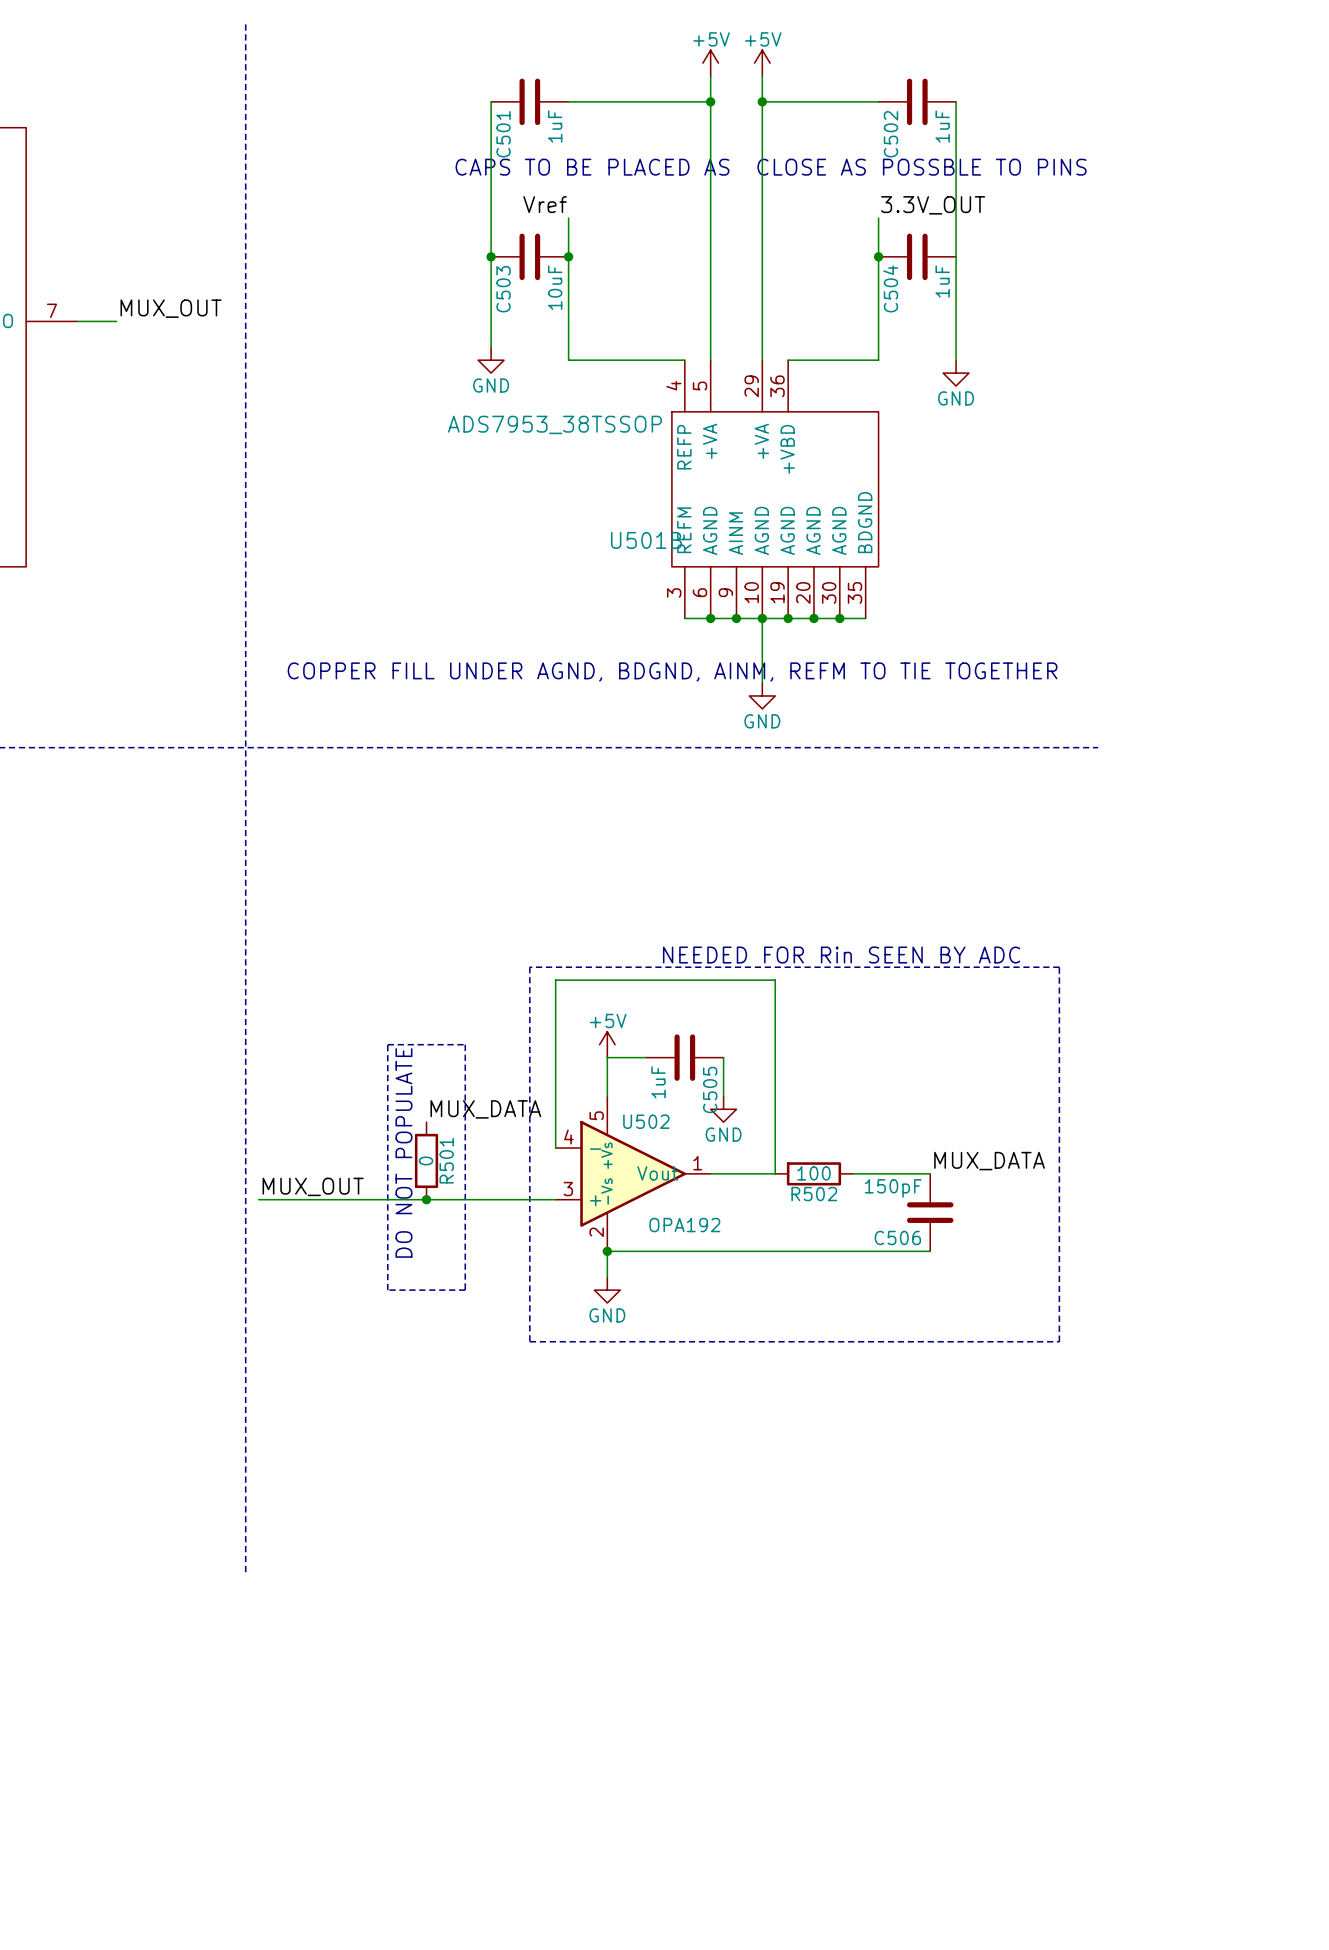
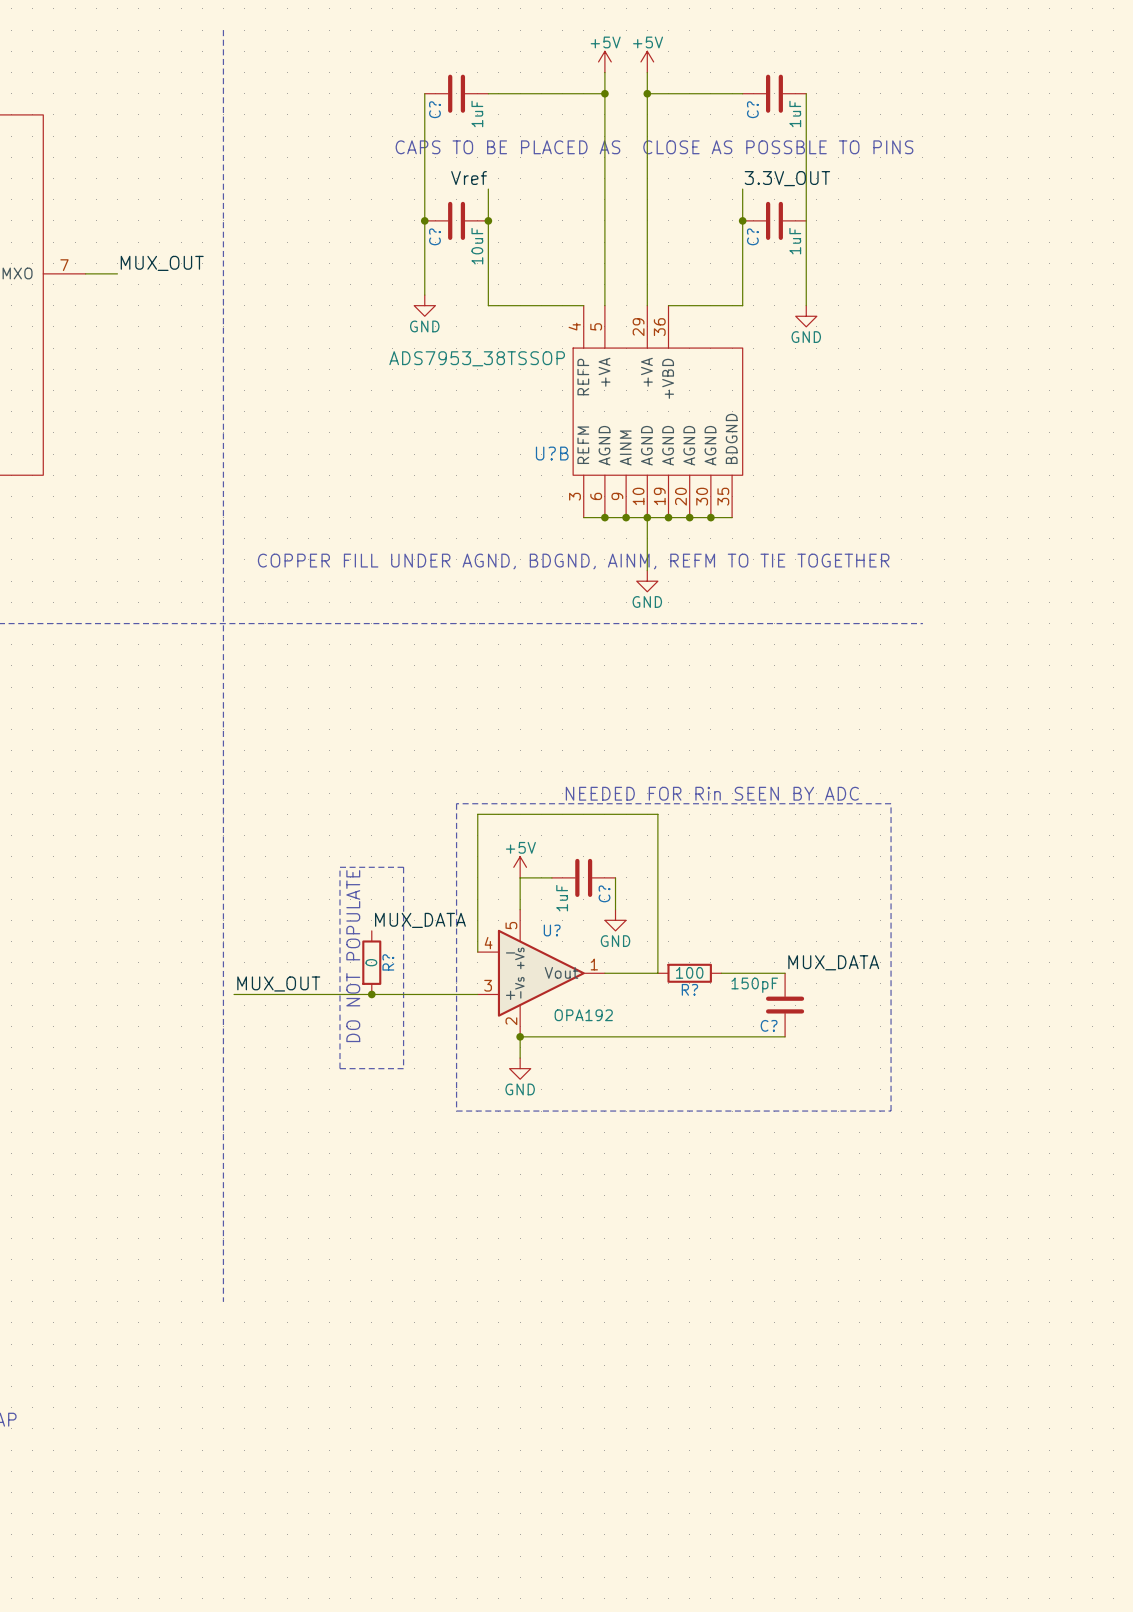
C501 name: C501 (503, 134) -> C? (434, 109)
C502 name: C502 (890, 134) -> C? (752, 109)
C504 name: C504 (890, 288) -> C? (752, 236)
C503 name: C503 (503, 289) -> C? (434, 236)
U501B name: U501B (646, 540) -> U?B (552, 453)
C505 name: C505 (710, 1090) -> C? (604, 893)
U502 name: U502 (646, 1121) -> U? (552, 930)
R501 name: R501 (446, 1160) -> R? (388, 962)
R502 name: R502 (814, 1194) -> R? (689, 989)
C506 name: C506 (897, 1237) -> C? (769, 1025)

